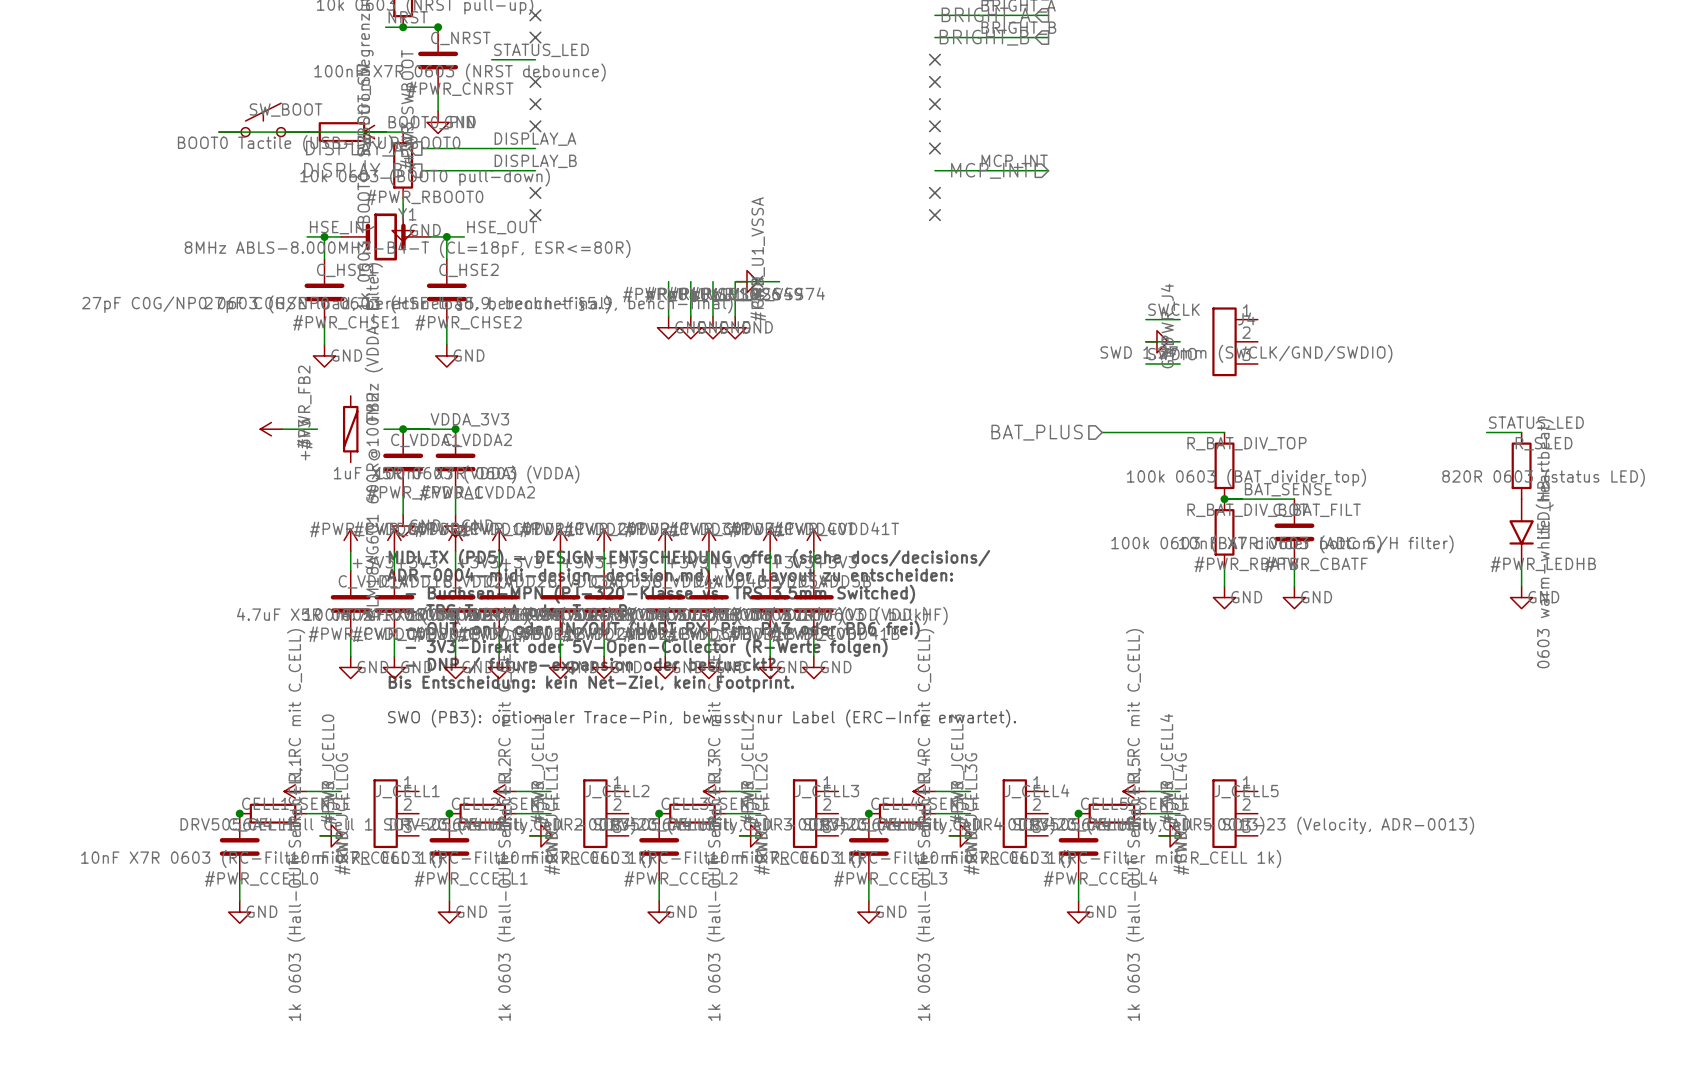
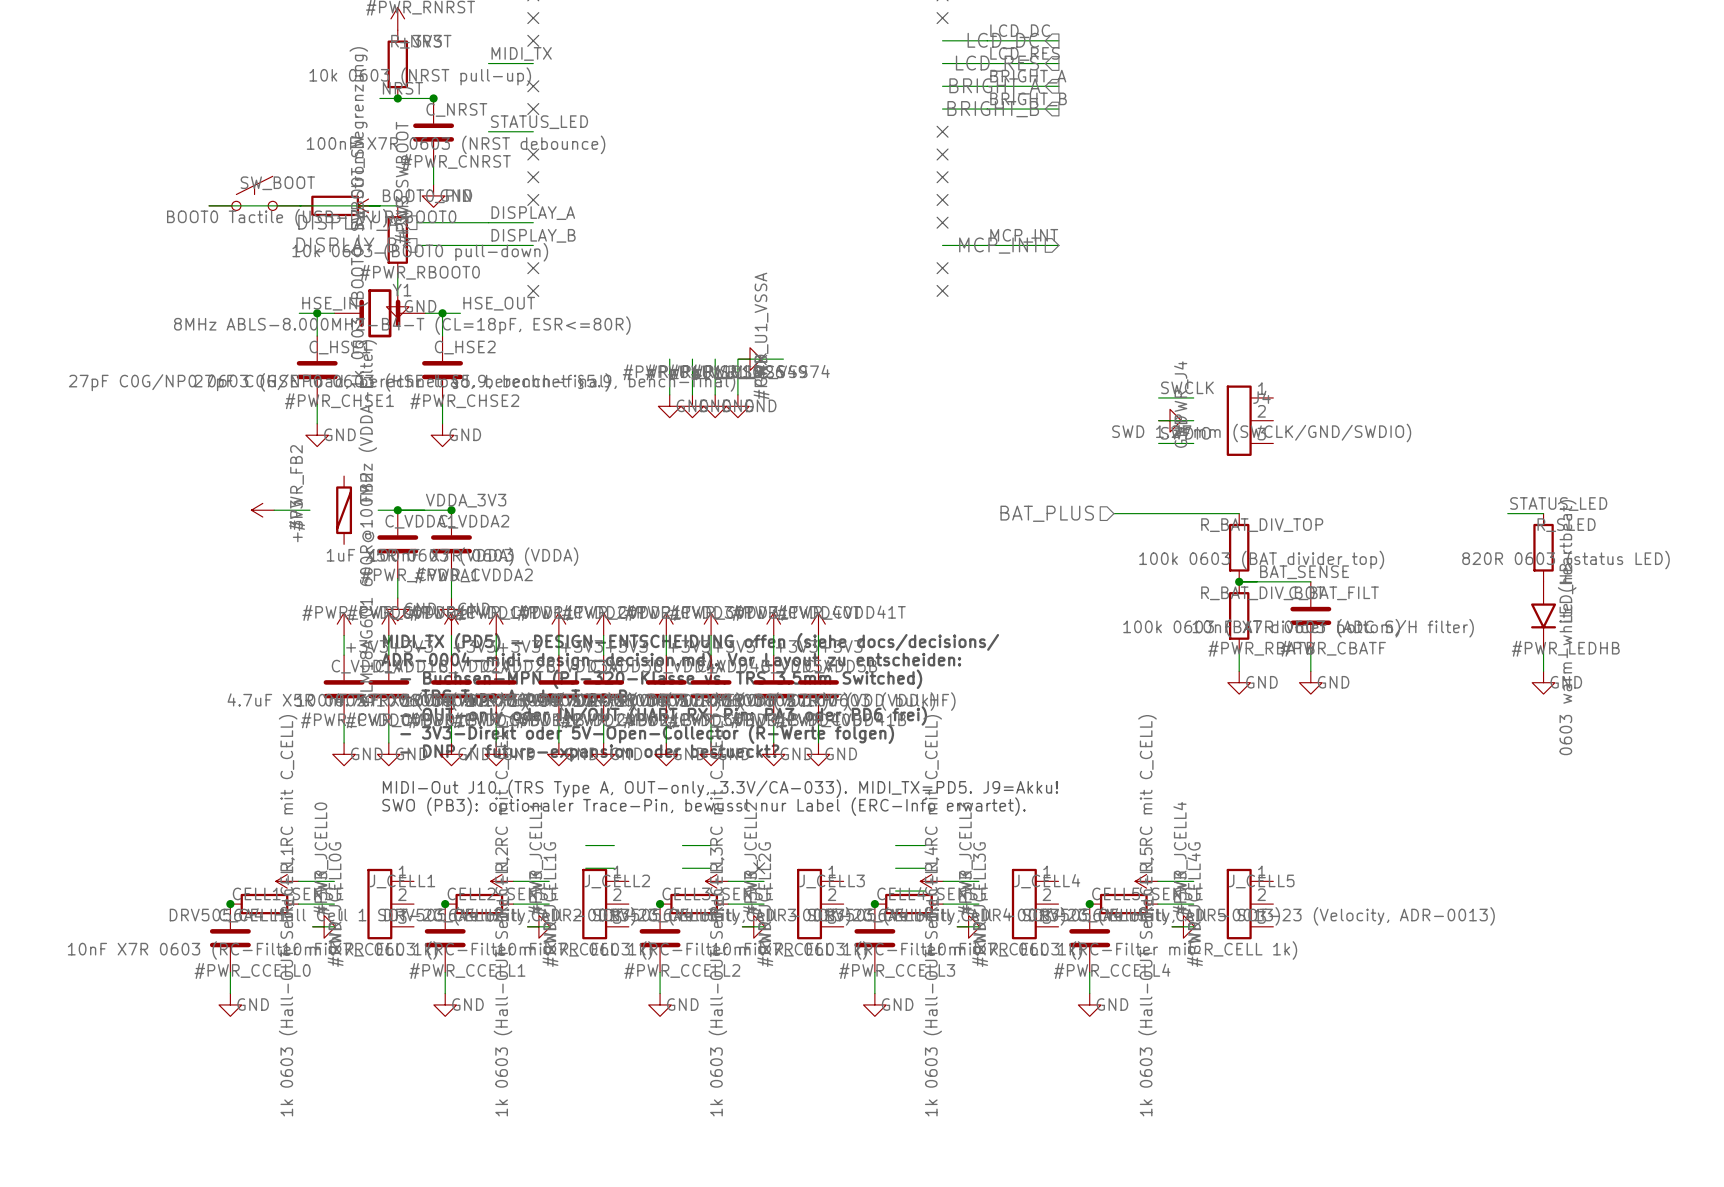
text: Bis Entscheidung: kein Net-Ziel, kein Footprint. (591, 684) -> none
text: none -> MIDI-Out J10 (TRS Type A, OUT-only, 3.3V/CA-033). MIDI_TX=PD5. J9=Akku! (720, 788)
wire: none -> (585, 845) (614, 845)
wire: none -> (682, 845) (711, 845)
wire: none -> (895, 845) (925, 845)
wire: none -> (585, 868) (614, 868)
wire: none -> (682, 868) (711, 868)
no-connect mark: none -> (759, 868)
wire: none -> (895, 868) (925, 868)
wire: none -> (895, 891) (925, 891)

